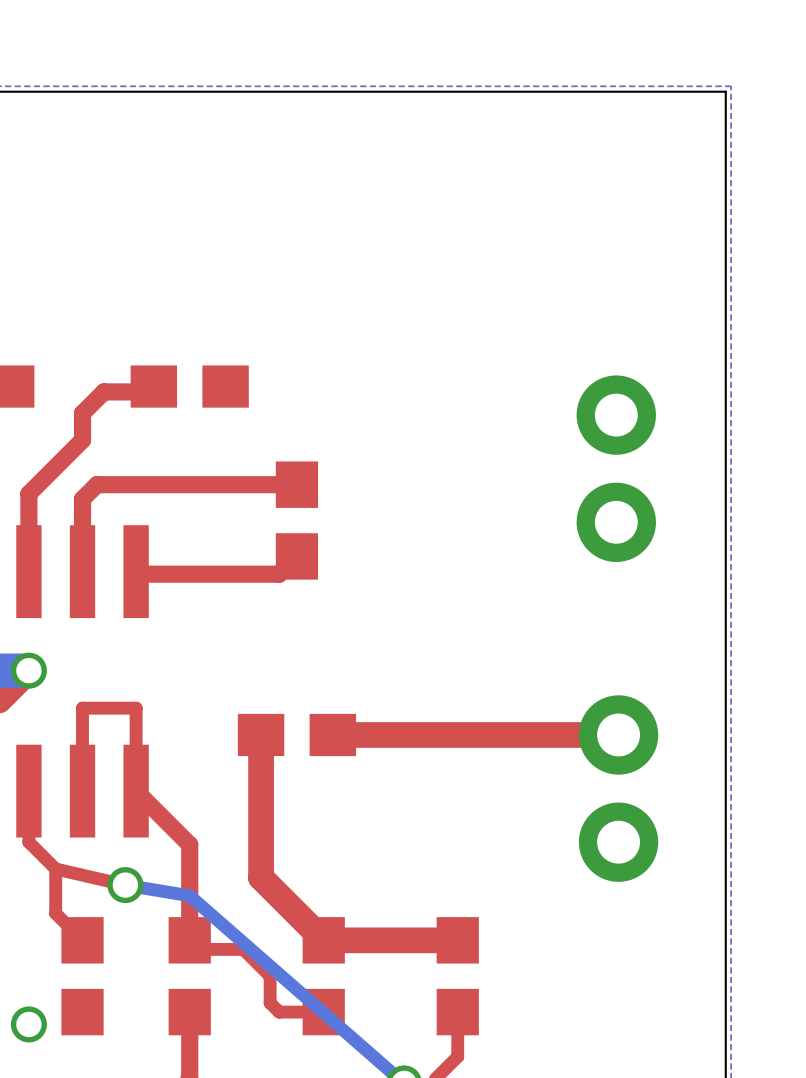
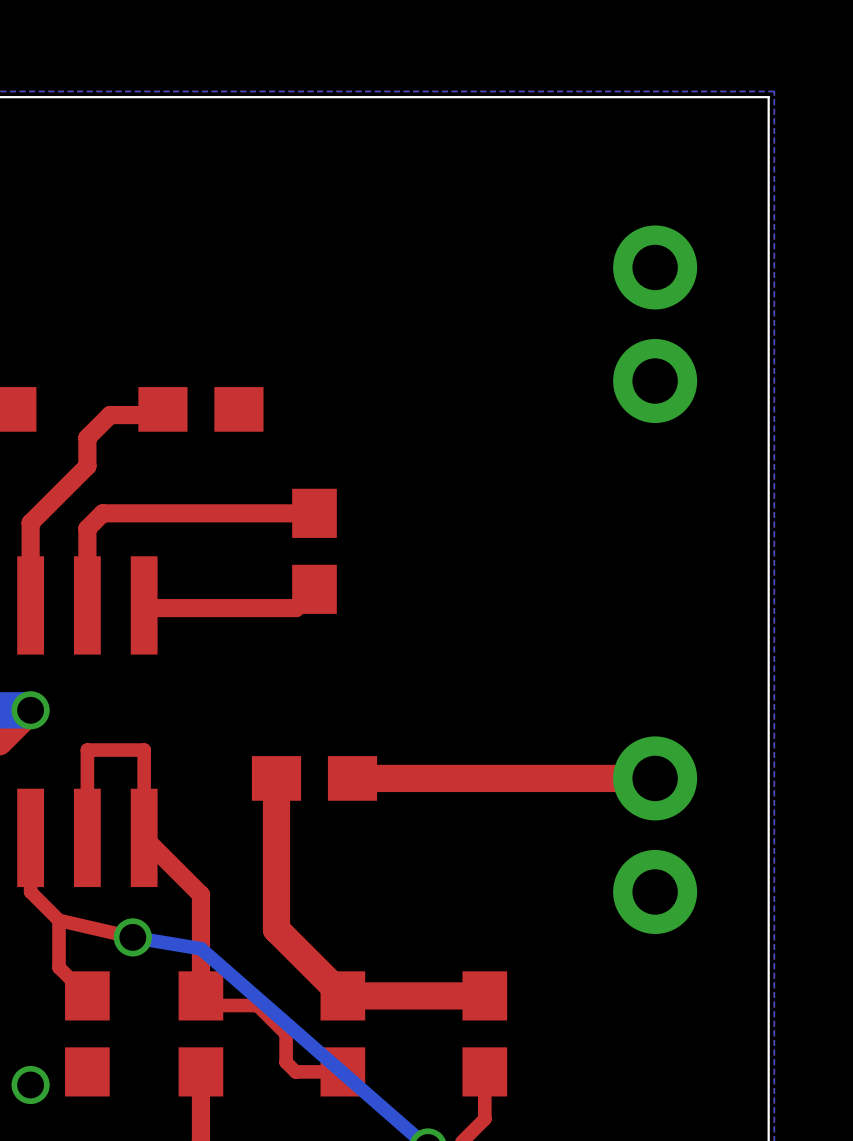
part position: (616, 468) -> (655, 324)

